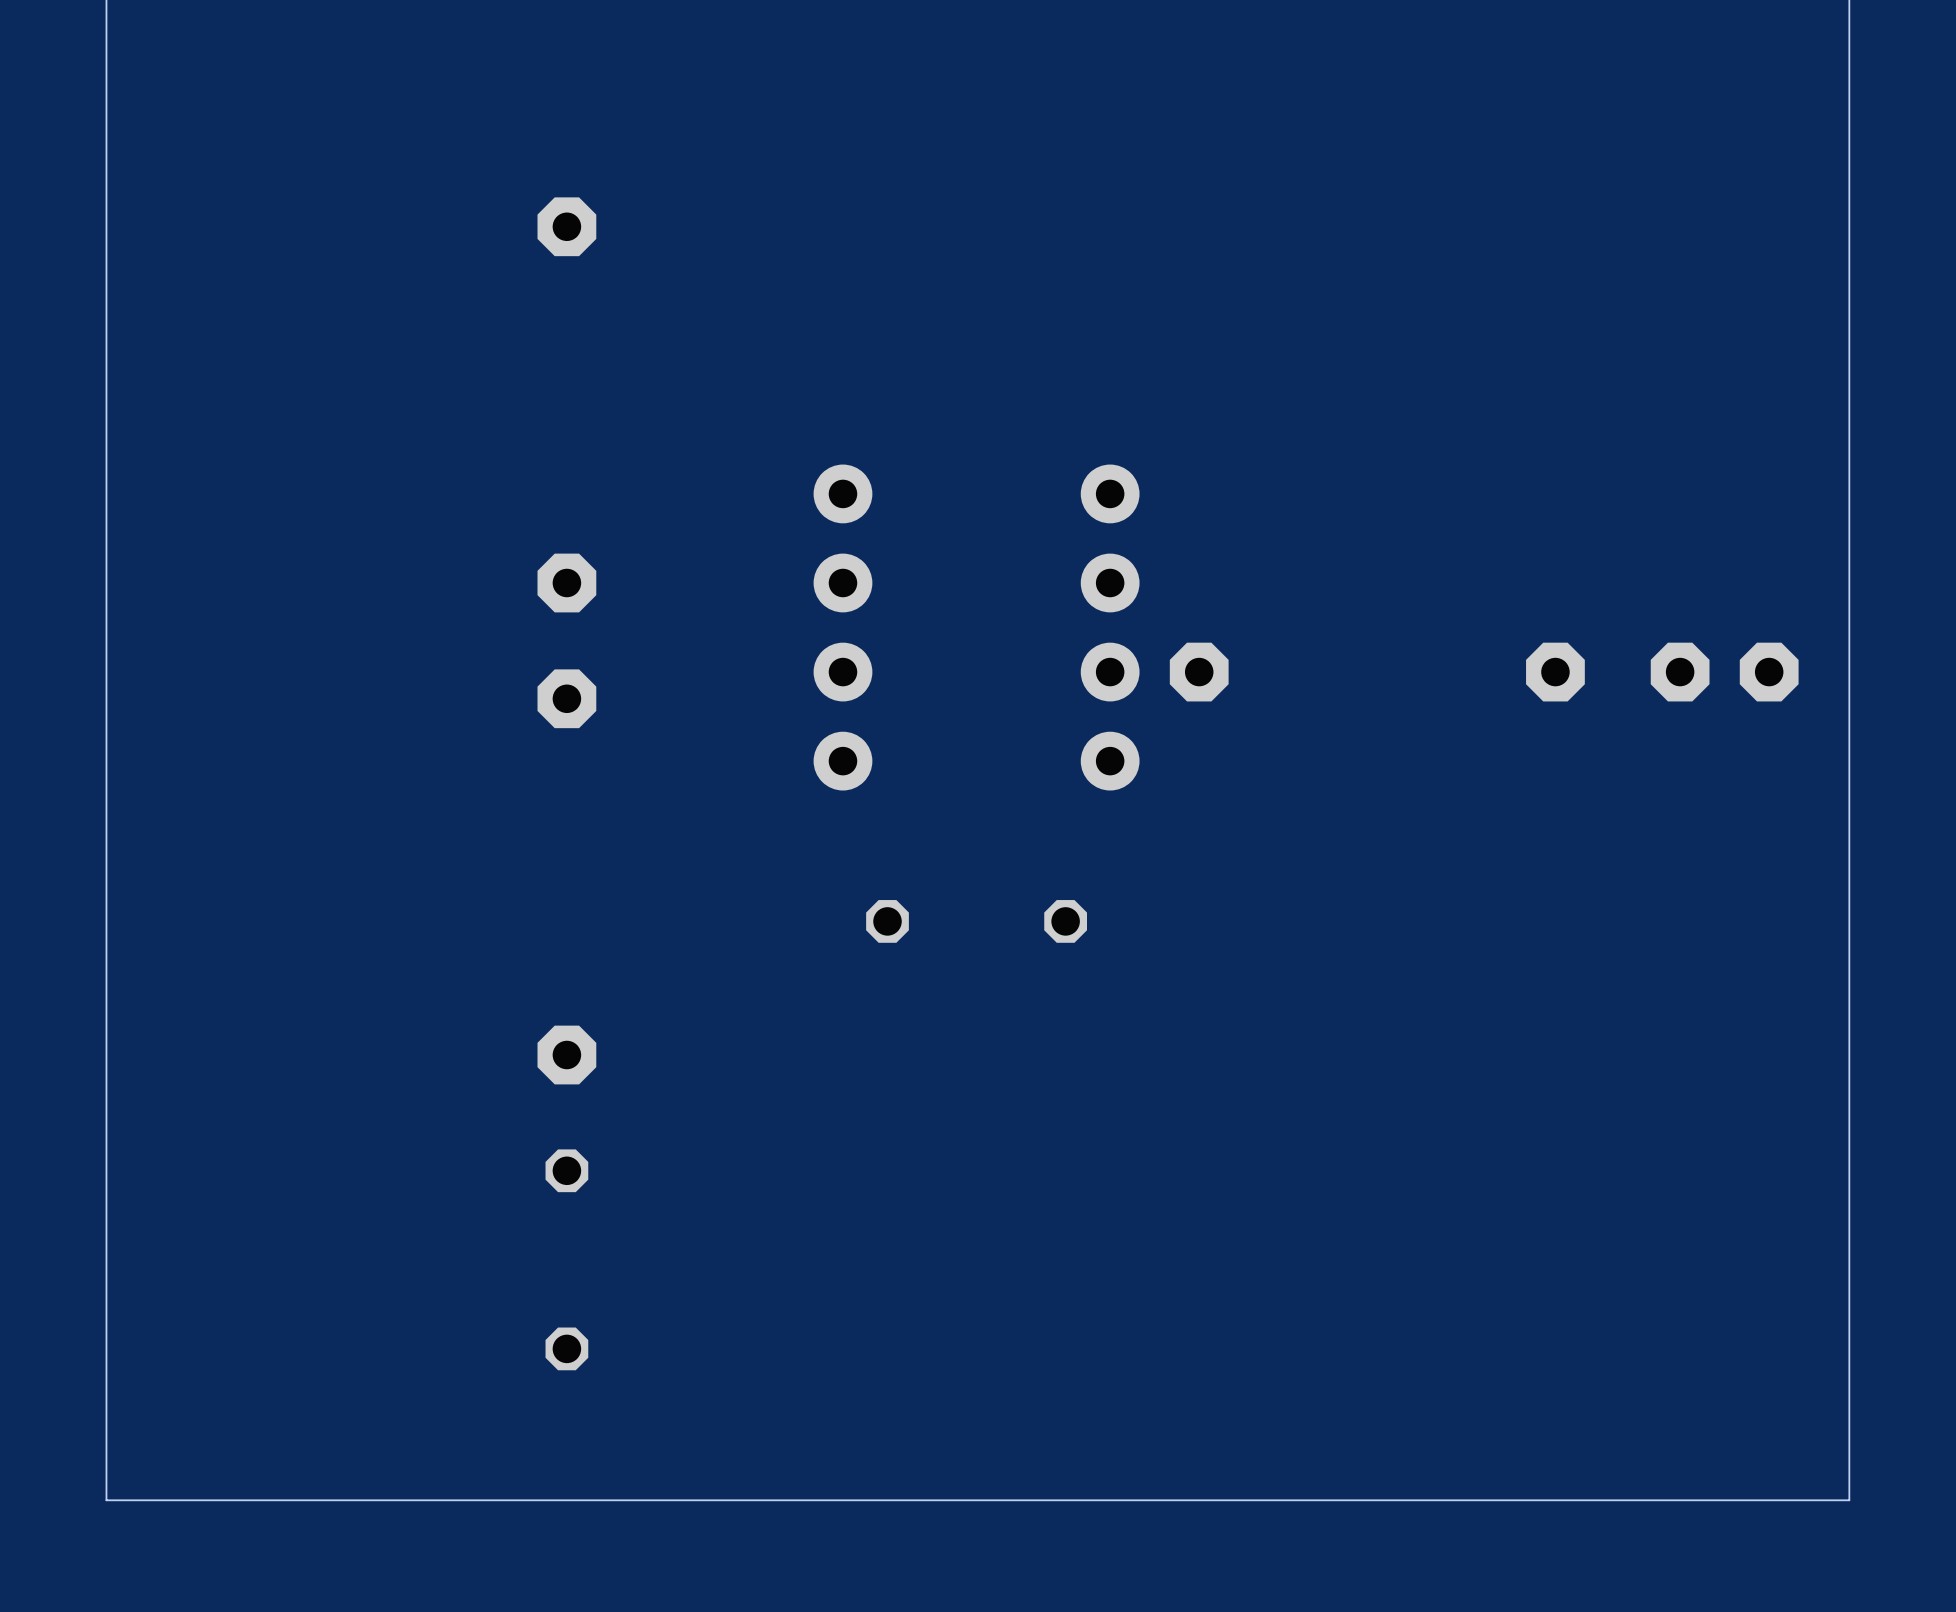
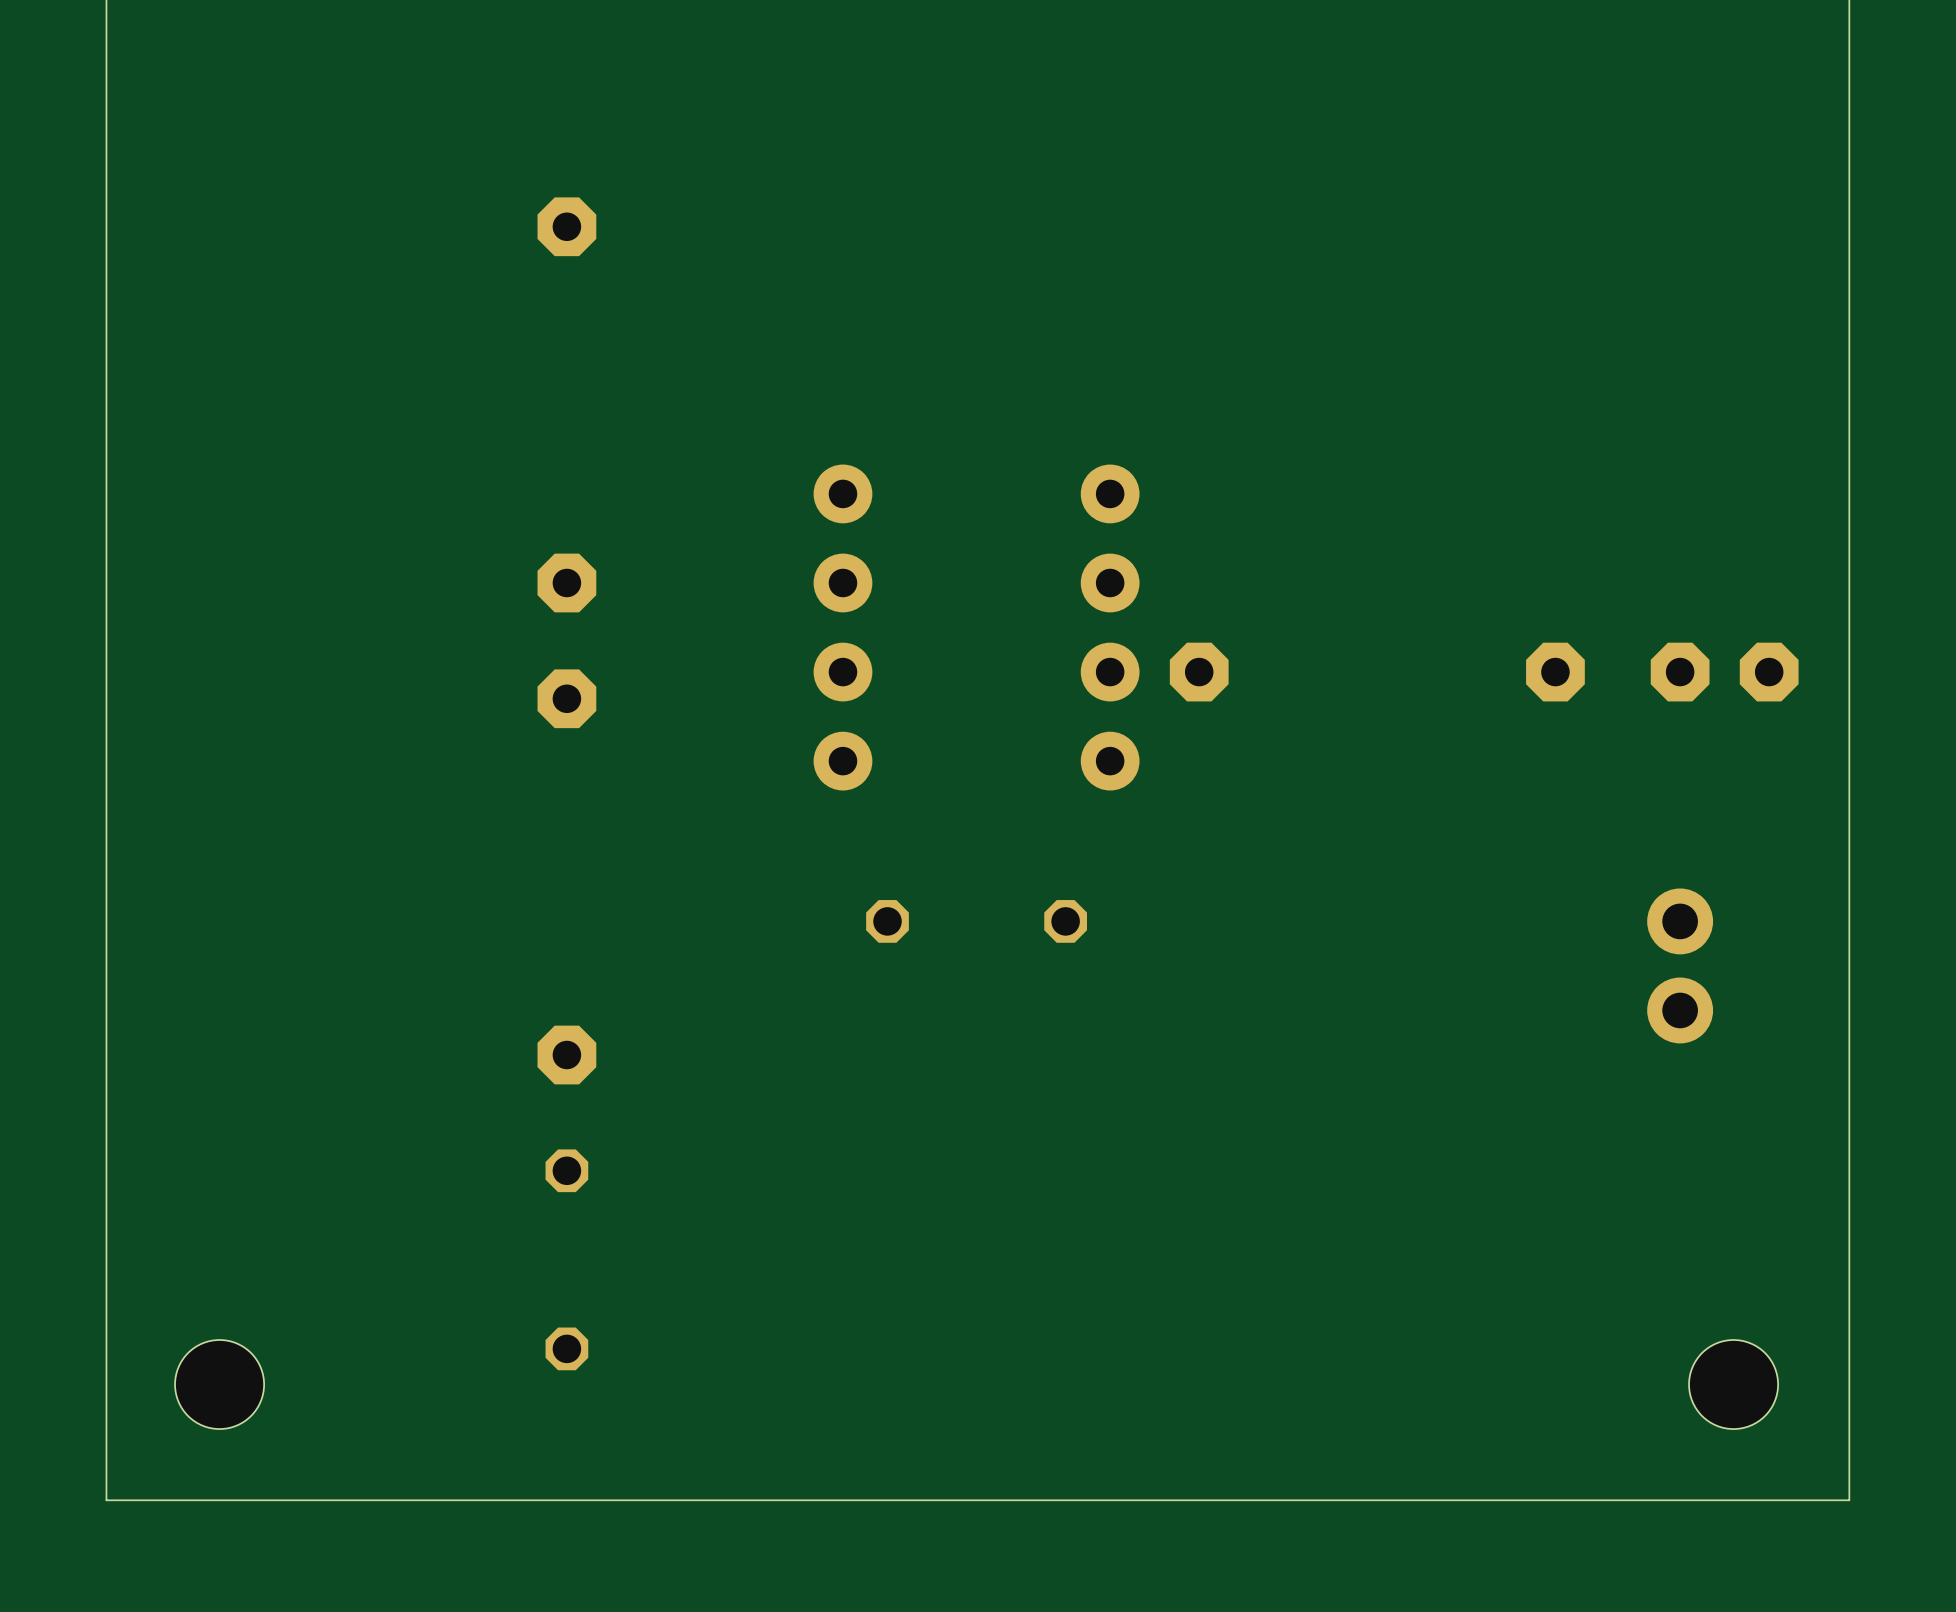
part: none -> (1680, 965)
hole: none -> (219, 1384)
hole: none -> (1733, 1384)

